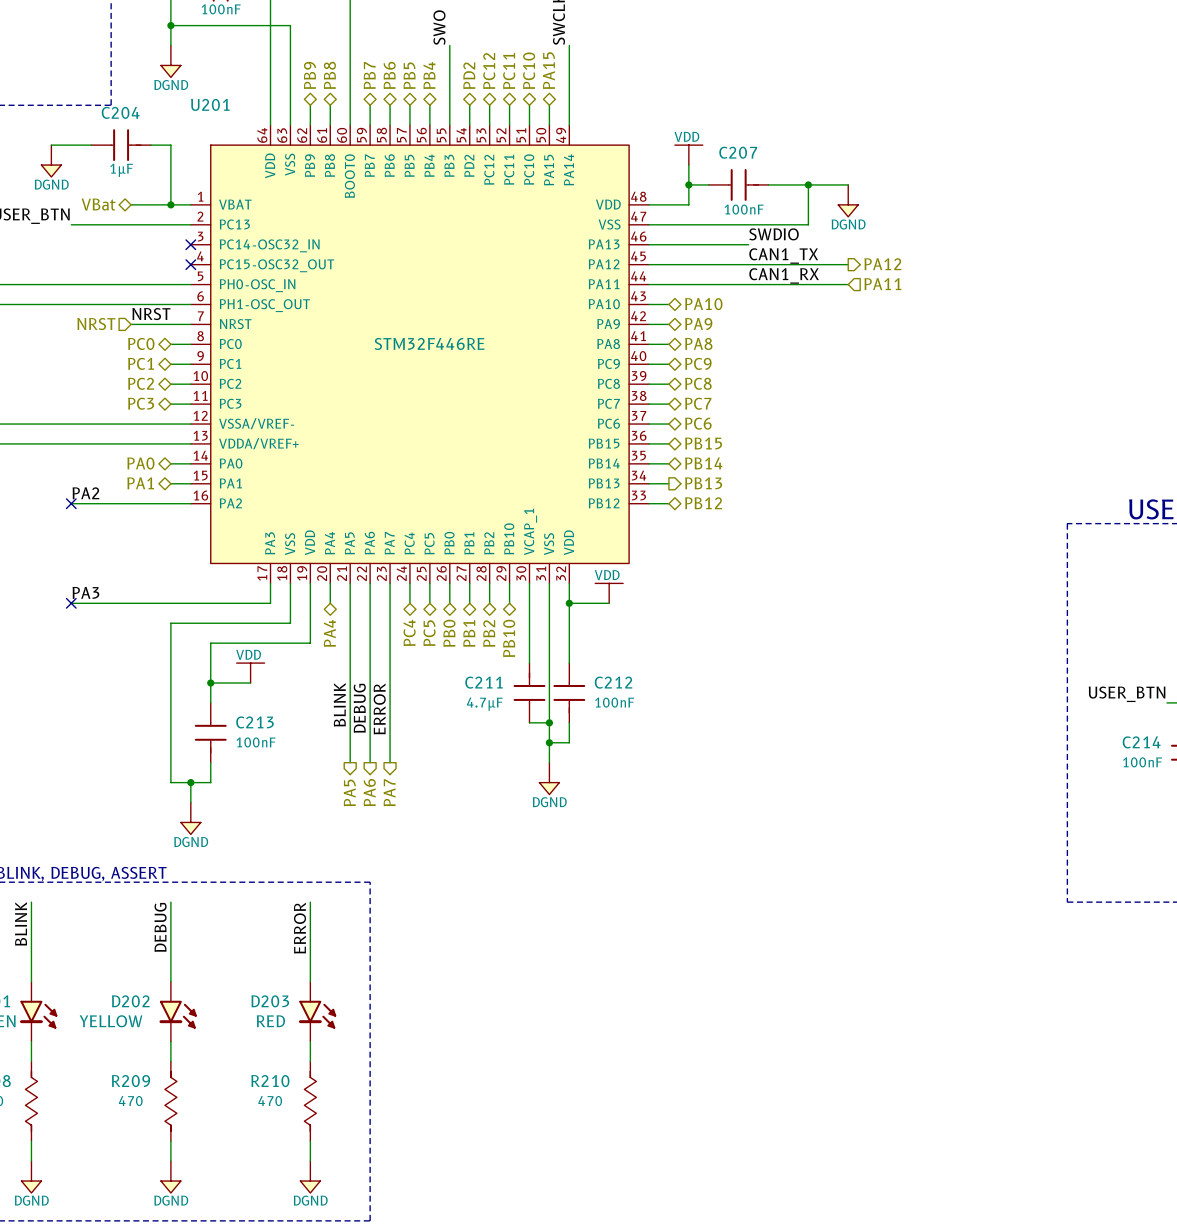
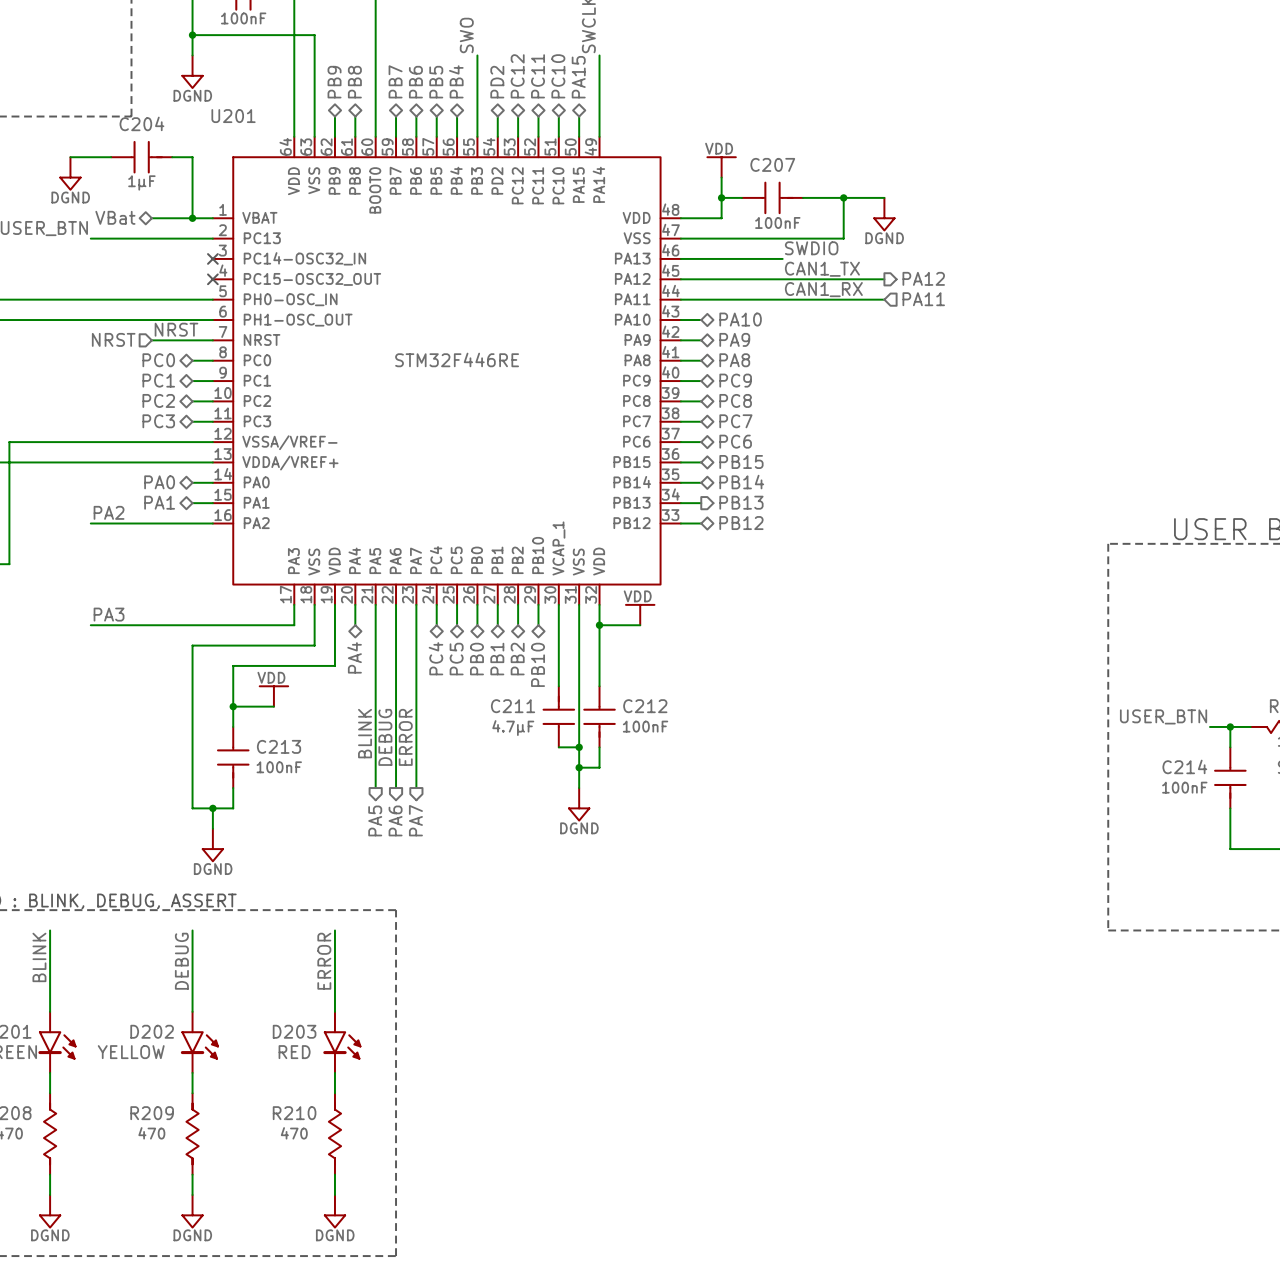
no-connect mark: (71, 503) -> none
no-connect mark: (71, 603) -> none

